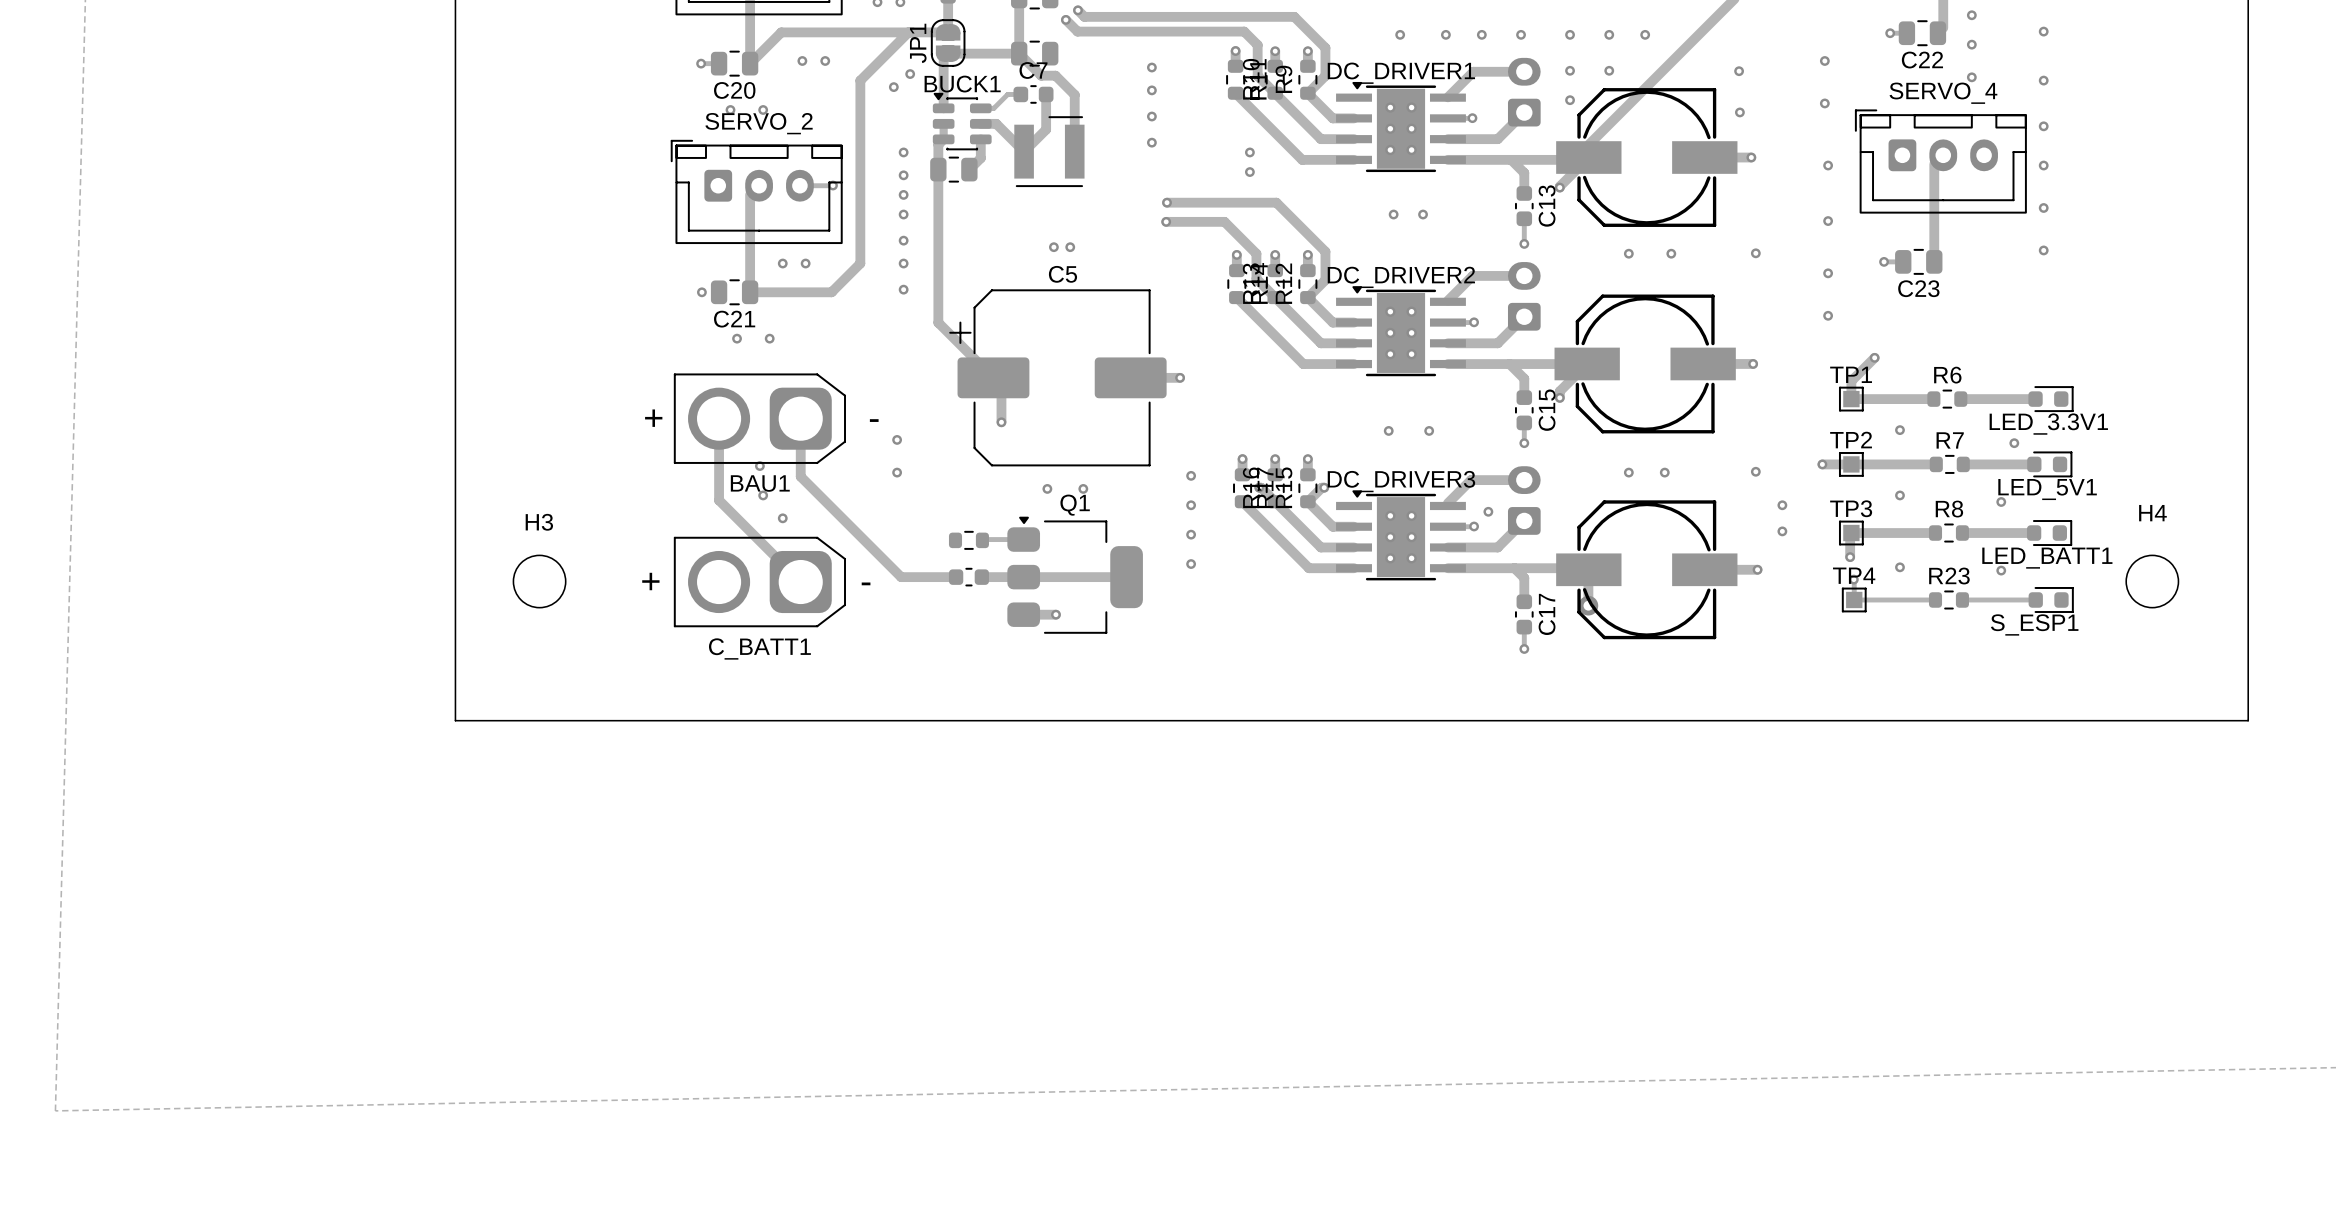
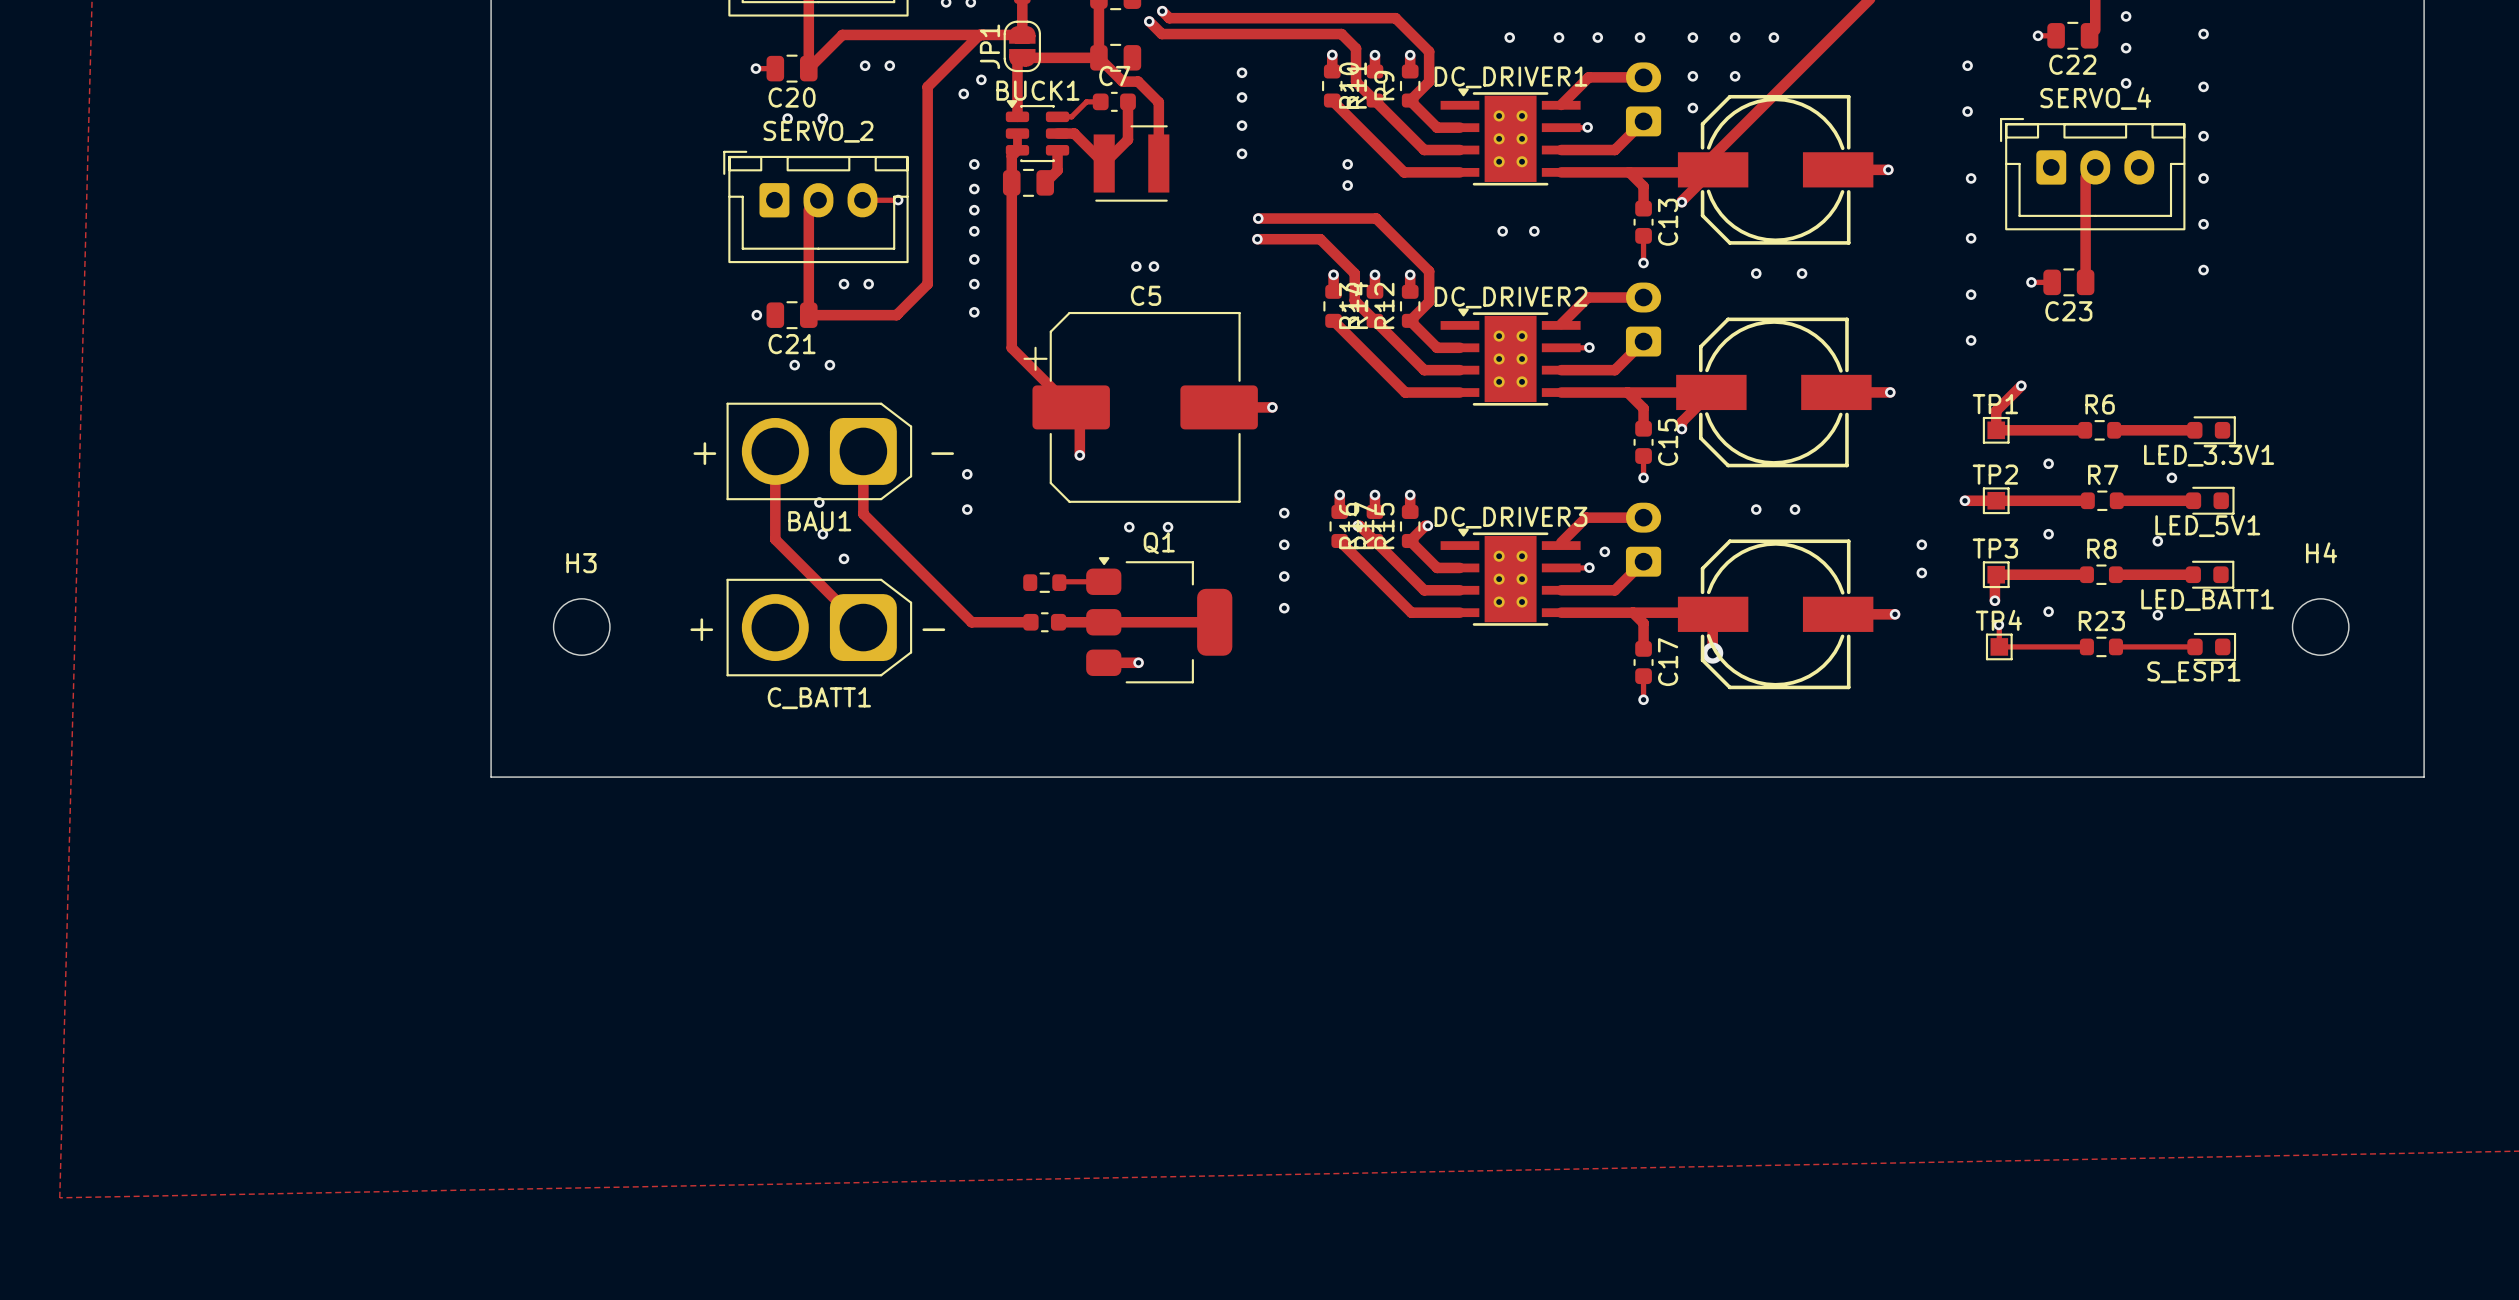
via: (1739, 71) -> none
via: (1739, 112) -> none
via: (1755, 253) -> none
via: (1388, 430) -> none
via: (1429, 430) -> none
via: (1755, 471) -> none

